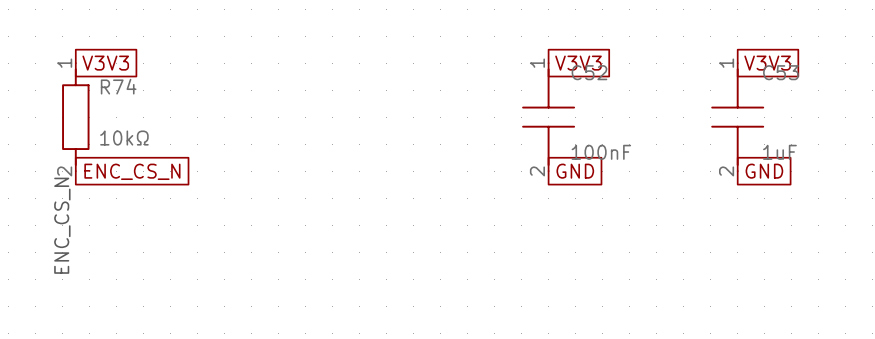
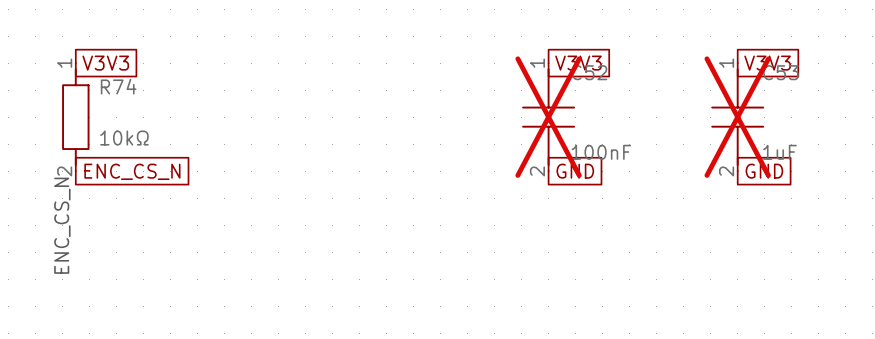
C52 do-not-place cross: none -> (548, 117)
C53 do-not-place cross: none -> (737, 117)

